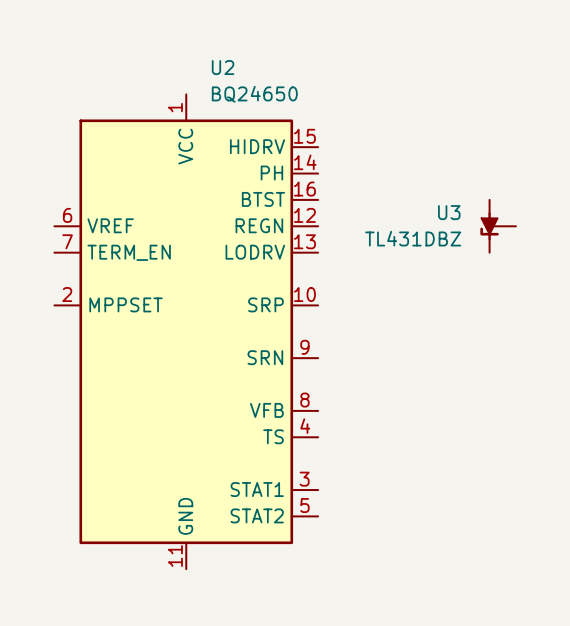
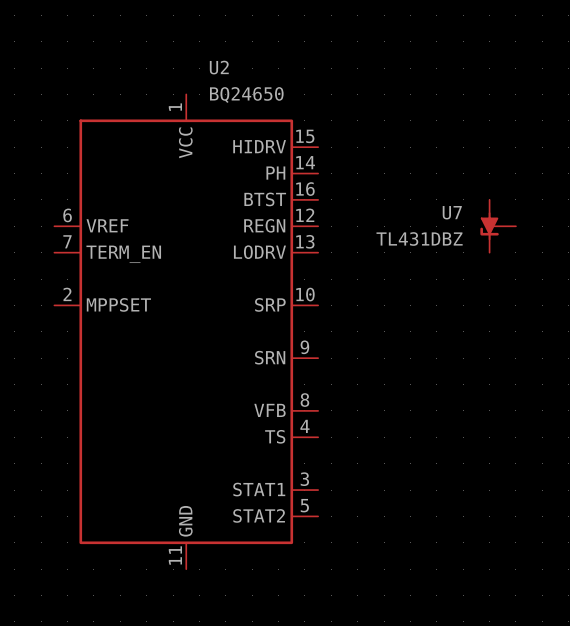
U3 name: U3 (449, 212) -> U7 (452, 212)

